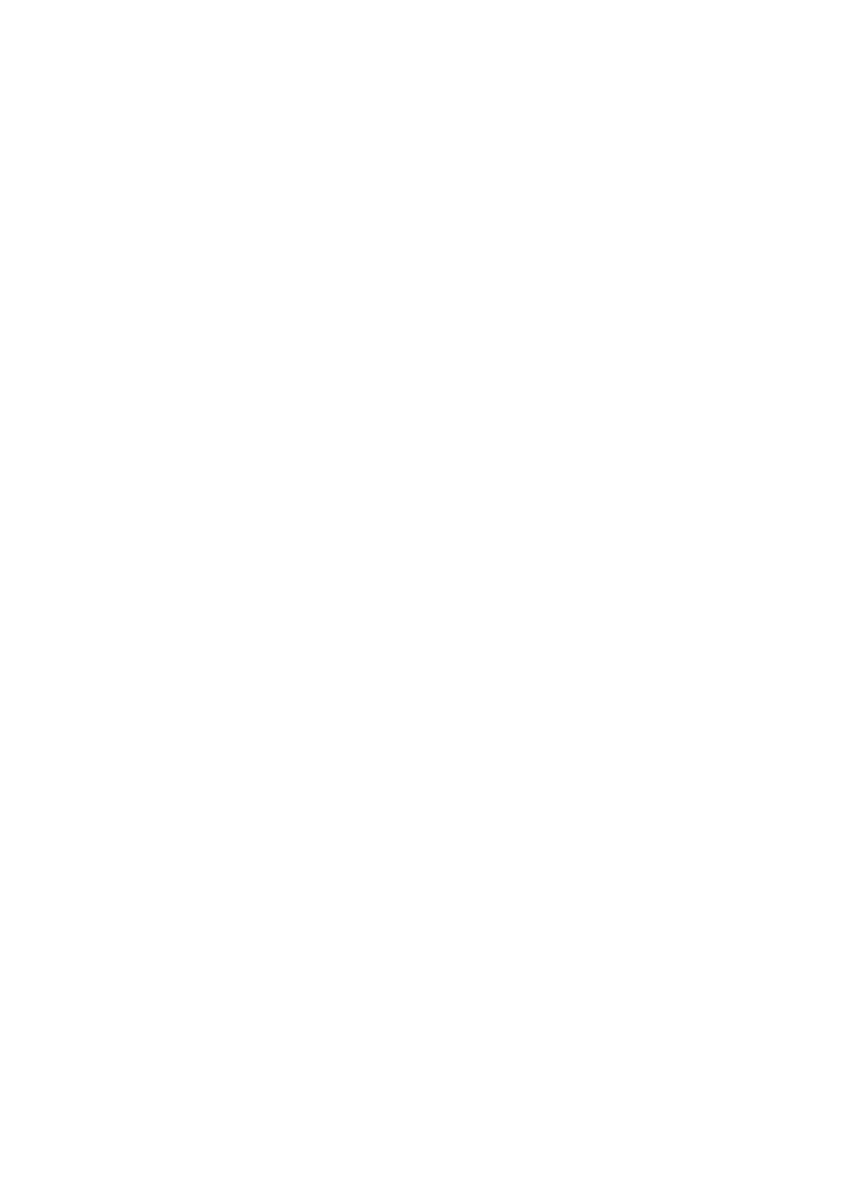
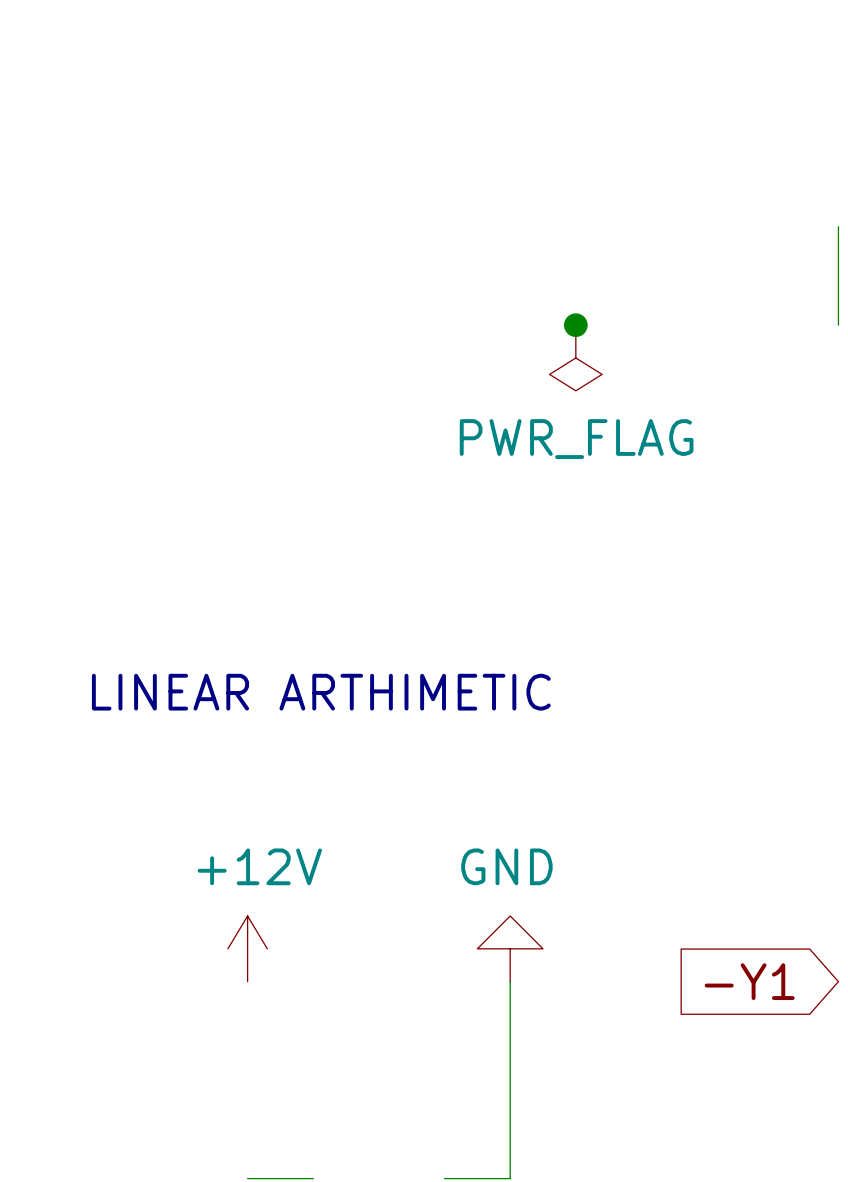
wire: none -> (838, 226) (838, 325)
junction: none -> (575, 325)
power symbol: none -> PWR_FLAG (575, 357)
text: none -> LINEAR ARTHIMETIC (321, 692)
power symbol: none -> +12V (247, 948)
power symbol: none -> GND (510, 948)
wire: none -> (510, 981) (510, 1178) (444, 1178)
global label: none -> -Y1 (749, 981)
wire: none -> (247, 1178) (313, 1178)

